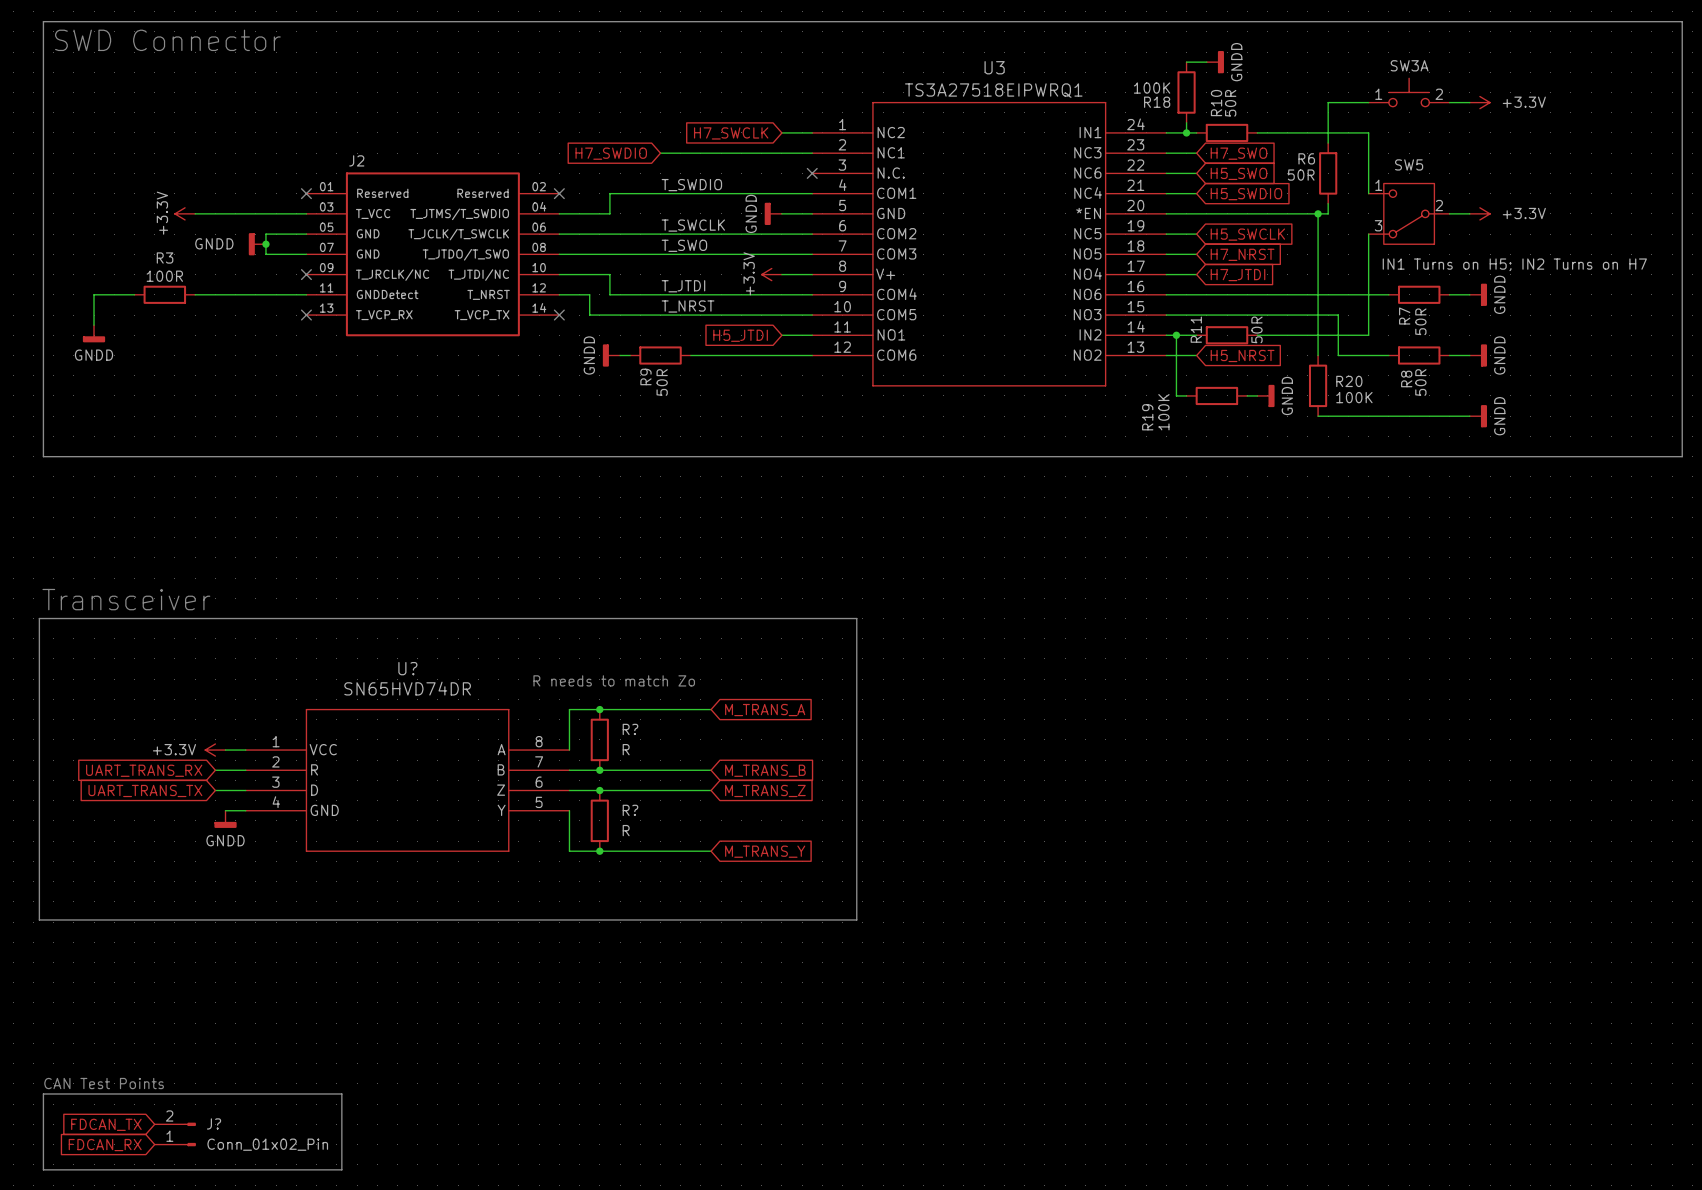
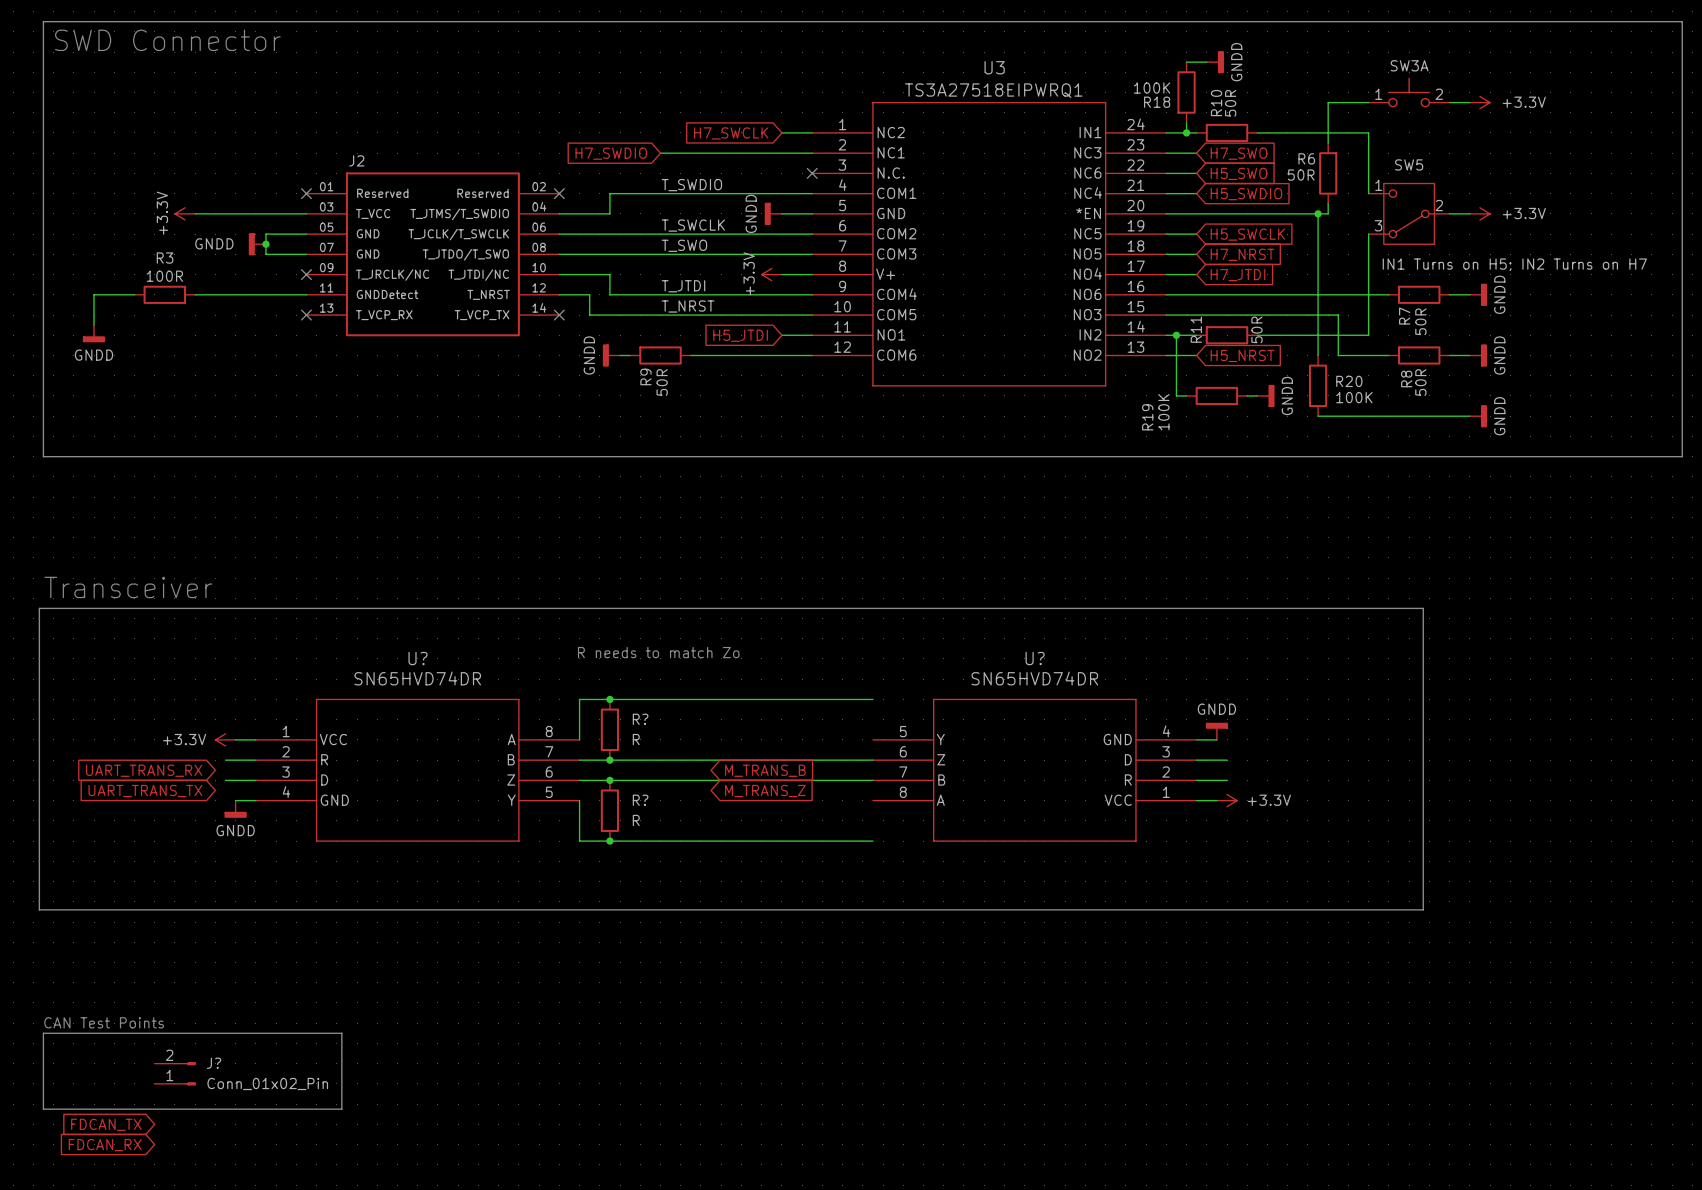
text position: Transceiver (126, 599) -> Transceiver (128, 587)
line: (39, 618) (856, 618) (856, 919) (39, 919) (39, 909) -> (39, 618) (39, 608) (1423, 608) (1423, 909) (39, 909)
text position: R needs to match Zo (614, 680) -> R needs to match Zo (658, 652)
wire: none -> (872, 699) (579, 699) (579, 739)
junction position: (599, 709) -> (609, 699)
wire: (711, 709) (569, 709) (569, 750) -> none
global label: M_TRANS_A (765, 710) -> none
power symbol: none -> GNDD (1216, 731)
R? position: (599, 739) -> (609, 729)
wire: none -> (1196, 739) (1216, 739)
power symbol position: +3.3V (215, 750) -> +3.3V (225, 739)
wire: (225, 750) (245, 750) -> (235, 739) (255, 739)
wire: none -> (579, 760) (872, 760)
junction: none -> (609, 760)
wire: none -> (1196, 760) (1227, 760)
wire: (215, 770) (245, 770) -> (225, 760) (255, 760)
wire: (569, 770) (711, 770) -> none
junction: (599, 770) -> none
U?: none -> SN65HVD74DR (1034, 770)
U? position: (407, 780) -> (417, 770)
wire: none -> (579, 780) (872, 780)
junction: none -> (609, 780)
wire: none -> (1196, 780) (1227, 780)
wire: (215, 790) (245, 790) -> (225, 780) (255, 780)
wire: (569, 790) (711, 790) -> none
junction: (599, 790) -> none
wire: none -> (579, 800) (579, 841) (872, 841)
wire: none -> (1196, 800) (1216, 800)
power symbol: none -> +3.3V (1227, 800)
wire: (225, 810) (245, 810) -> (235, 800) (255, 800)
wire: (569, 810) (569, 851) (711, 851) -> none
power symbol position: GNDD (225, 819) -> GNDD (235, 809)
R? position: (599, 820) -> (609, 810)
junction position: (599, 851) -> (609, 841)
global label: M_TRANS_Y (765, 851) -> none
text position: CAN Test Points (104, 1083) -> CAN Test Points (104, 1022)
line: (43, 1093) (341, 1093) -> (43, 1093) (43, 1033) (341, 1033) (341, 1093)
line: (43, 1109) (43, 1169) (341, 1169) (341, 1109) -> (43, 1109) (341, 1109)
J? position: (175, 1134) -> (175, 1073)

